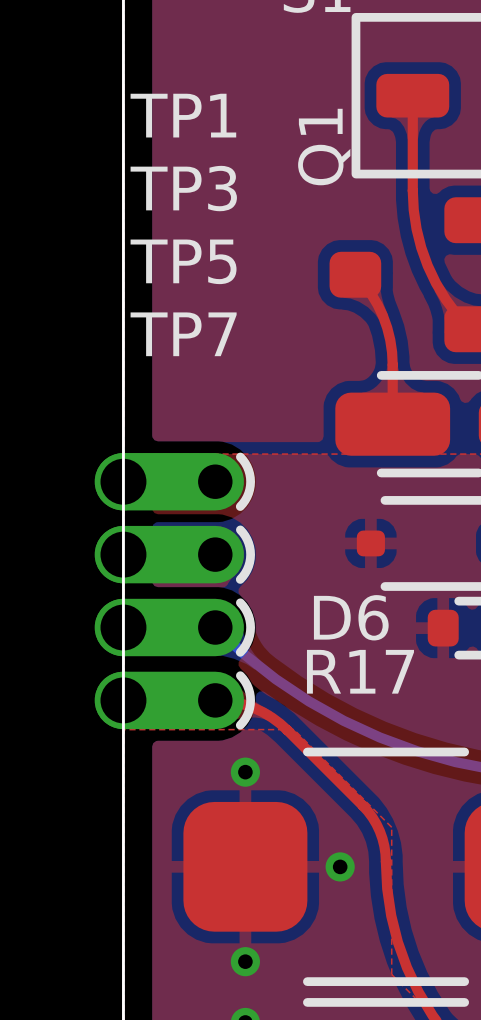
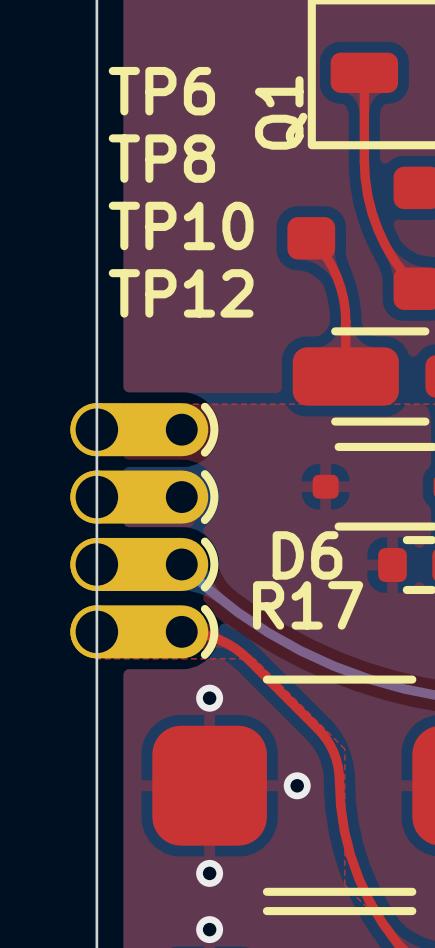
TP1 name: TP1 (183, 115) -> TP6 (161, 91)
TP3 name: TP3 (183, 188) -> TP8 (161, 158)
TP5 name: TP5 (183, 261) -> TP10 (181, 225)
TP7 name: TP7 (183, 334) -> TP12 (181, 293)

